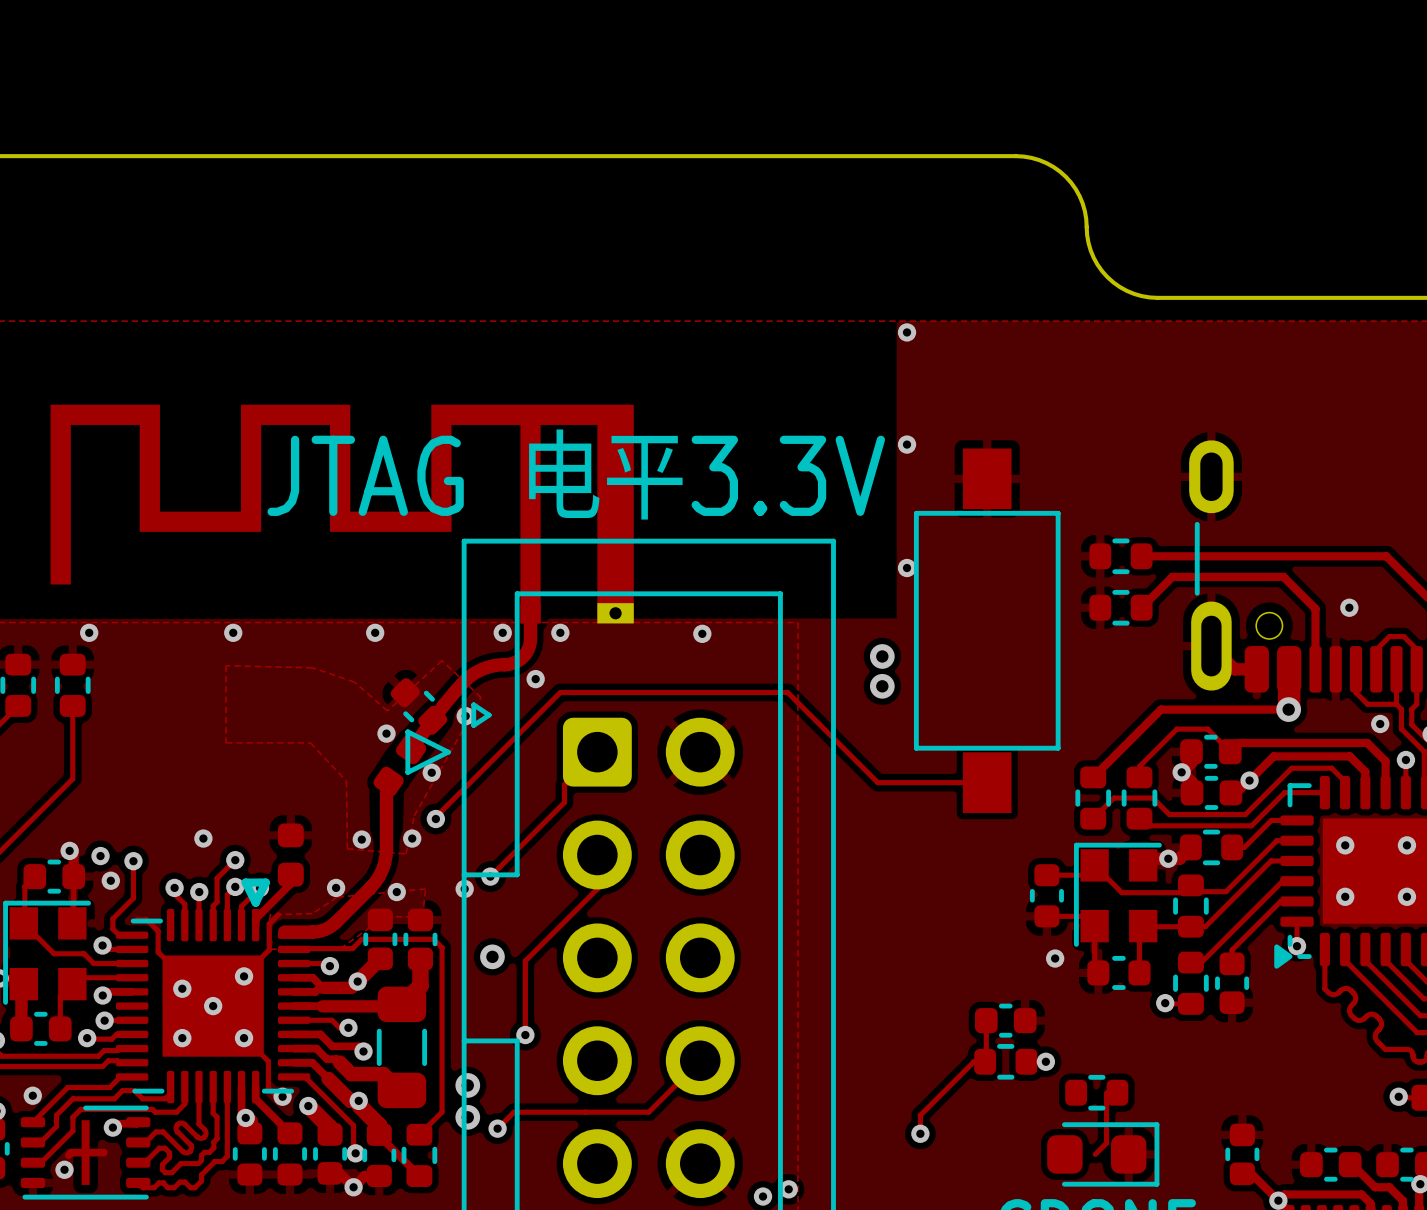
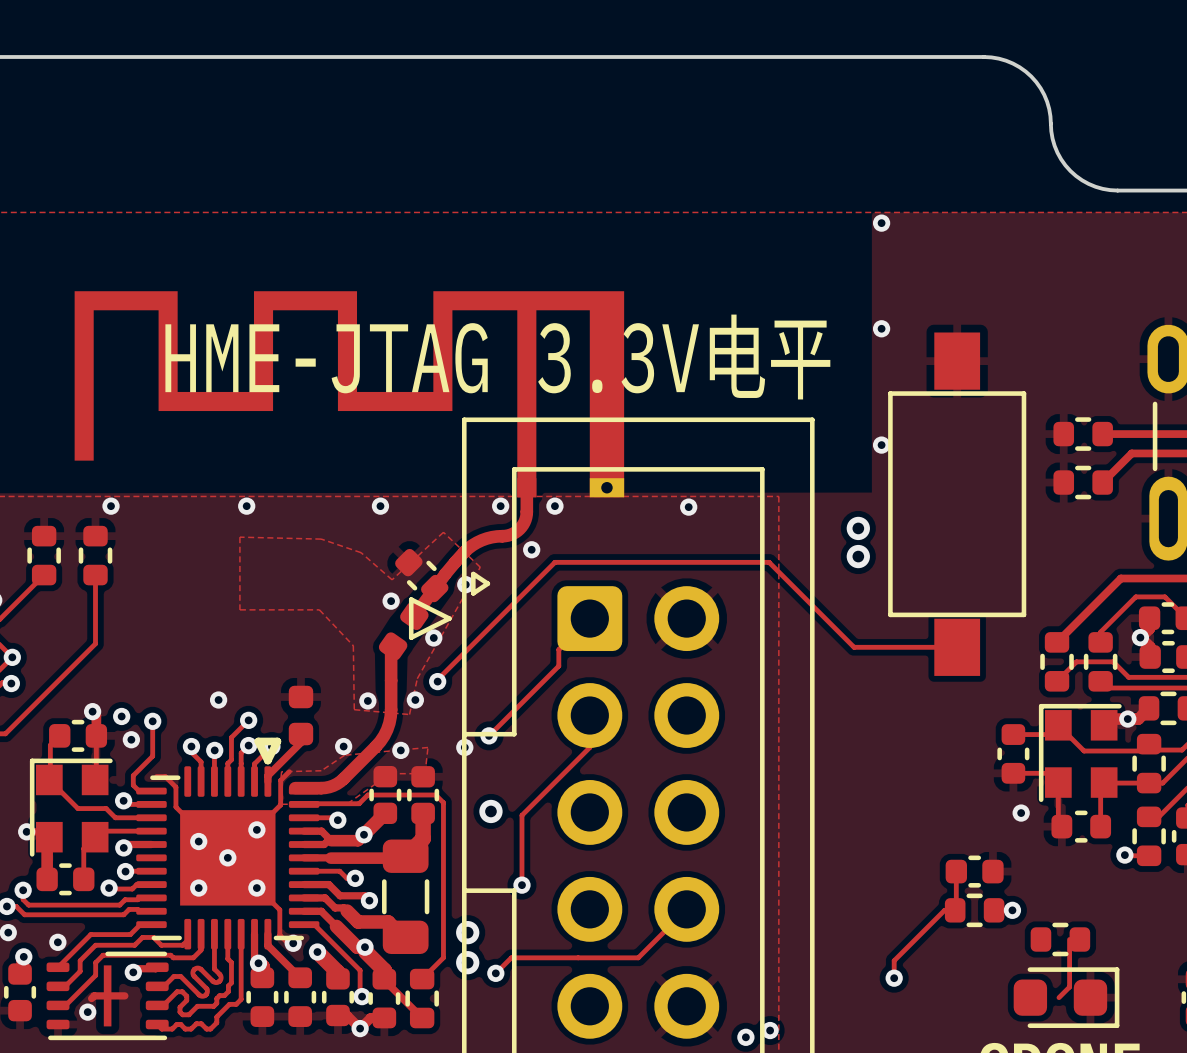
text: JTAG 电平3.3V (576, 474) -> HME-JTAG 3.3V电平 (497, 357)

